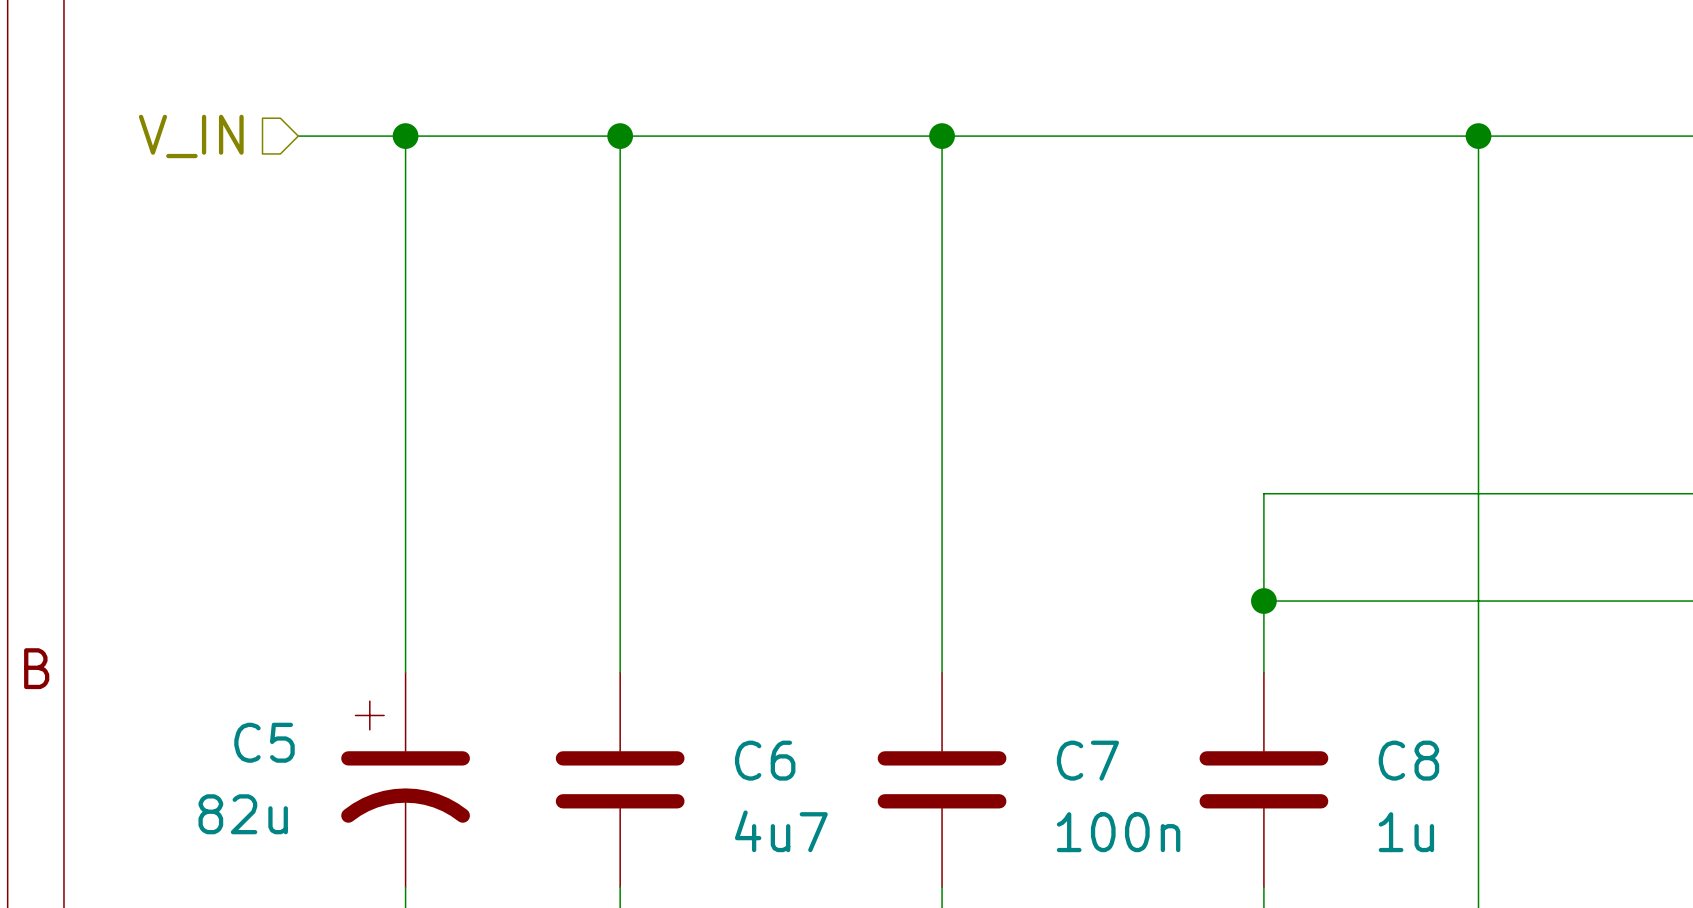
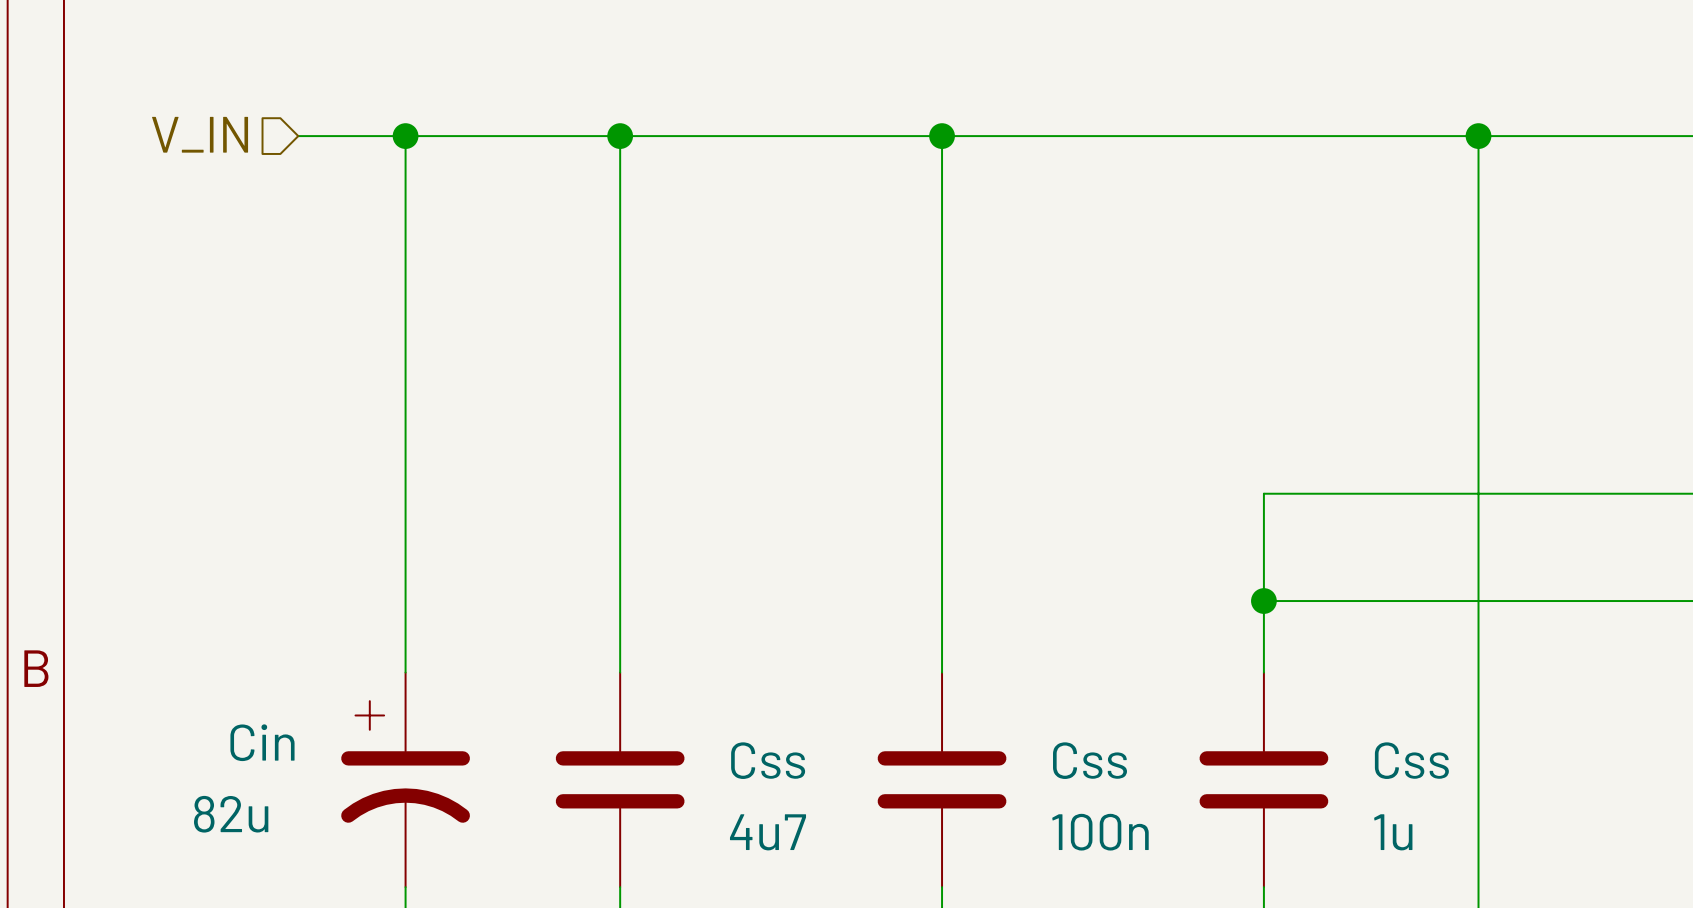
C5 name: C5 (264, 742) -> Cin (262, 742)
C6 name: C6 (765, 760) -> Css (768, 760)
C7 name: C7 (1087, 760) -> Css (1090, 760)
C8 name: C8 (1408, 760) -> Css (1411, 760)

